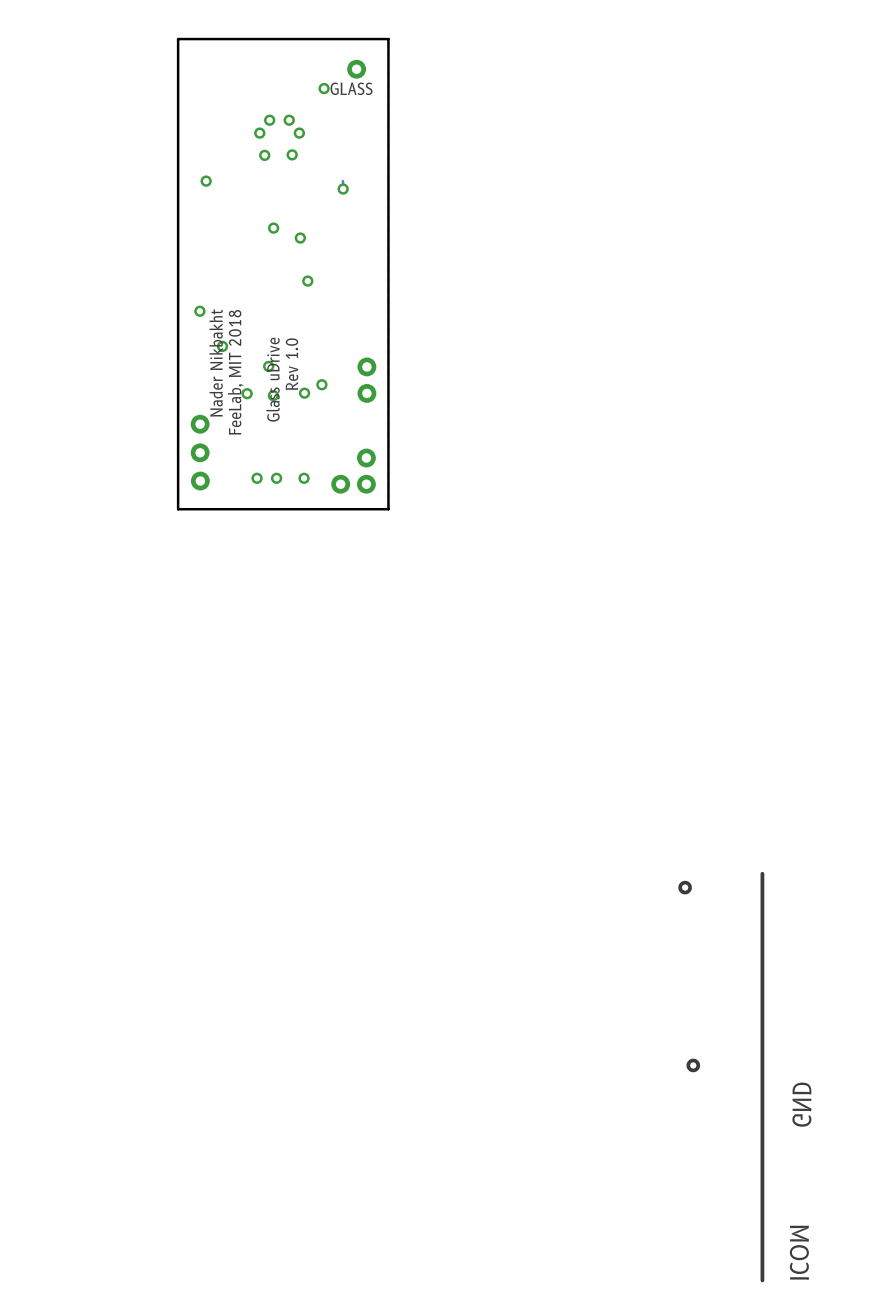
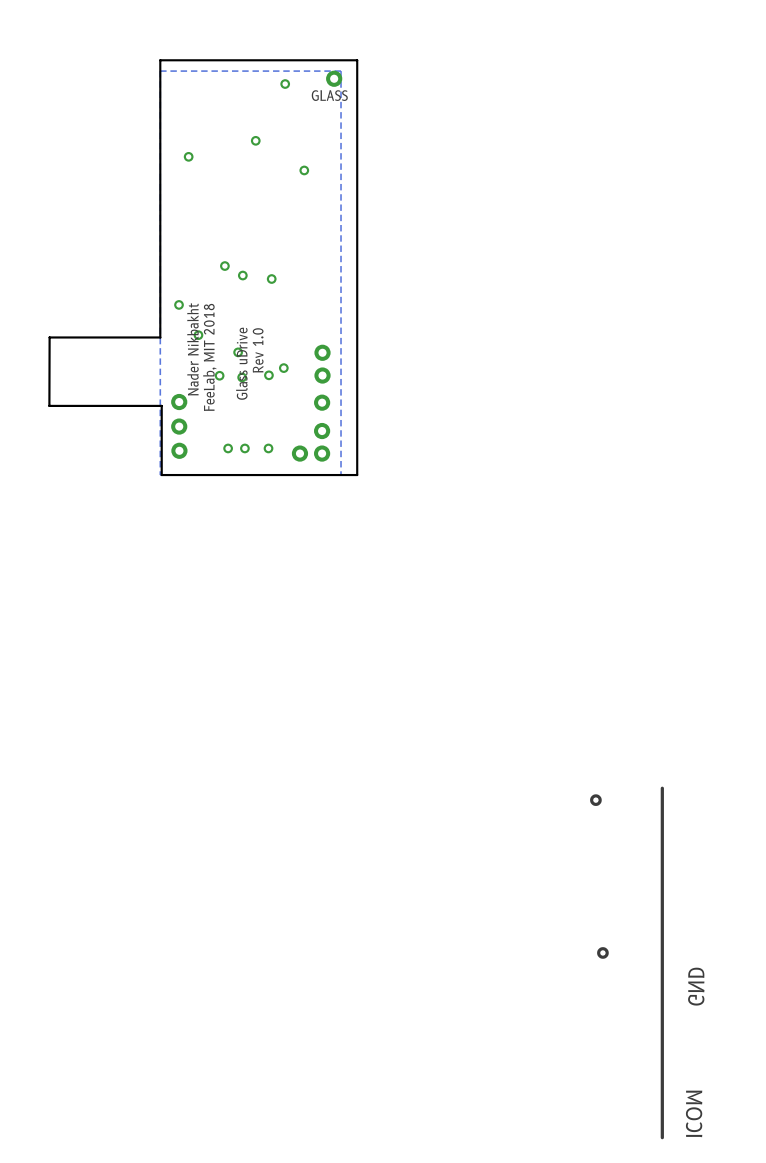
board edge: (178, 39) (388, 39) (388, 509) -> (160, 71) (160, 60) (357, 60) (357, 475) (341, 475)
GLASS position: (356, 69) -> (334, 78)
via position: (324, 88) -> (285, 84)
via: (269, 120) -> none
via: (259, 133) -> none
via: (299, 133) -> none
via: none -> (188, 156)
via: (292, 154) -> none
via: none -> (304, 170)
via: (264, 155) -> none
via: (206, 181) -> none
track: (342, 181) (343, 189) -> none
via: (343, 189) -> none
via: (273, 228) -> none
via: (300, 238) -> none
via: none -> (224, 266)
via: none -> (242, 275)
board edge: (178, 349) (178, 509) (179, 509) -> (160, 337) (49, 337) (49, 405) (161, 405) (161, 475)
part: none -> (322, 402)

